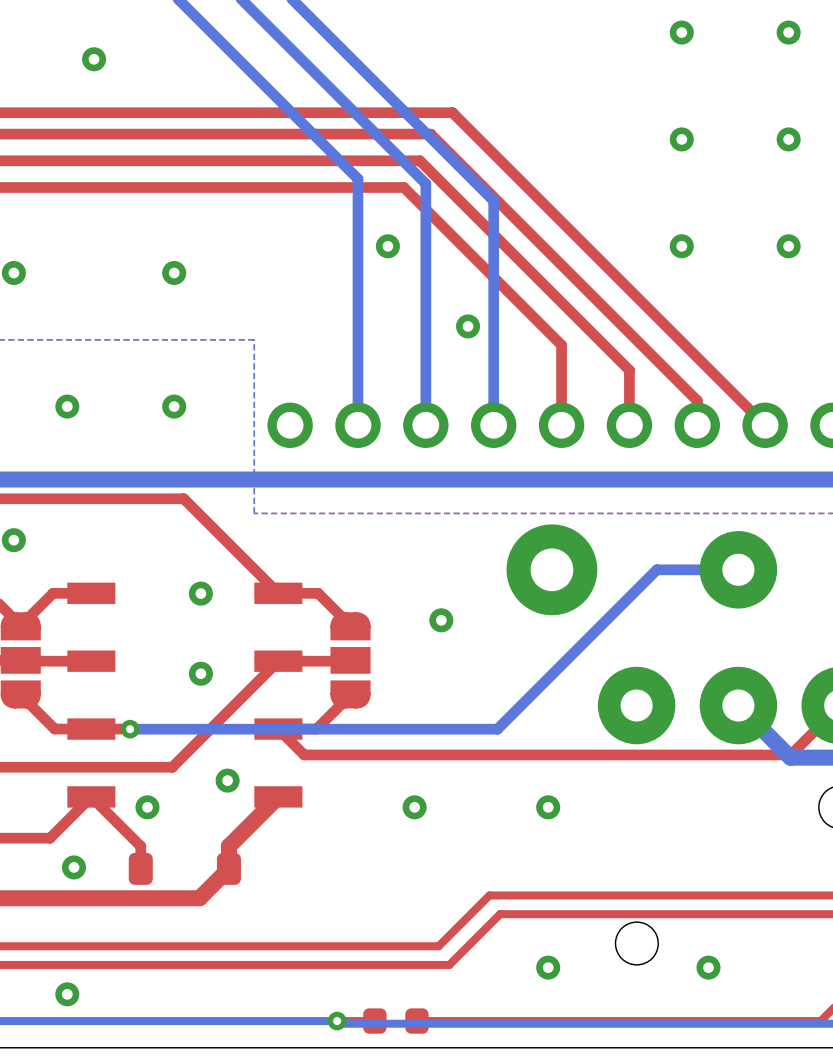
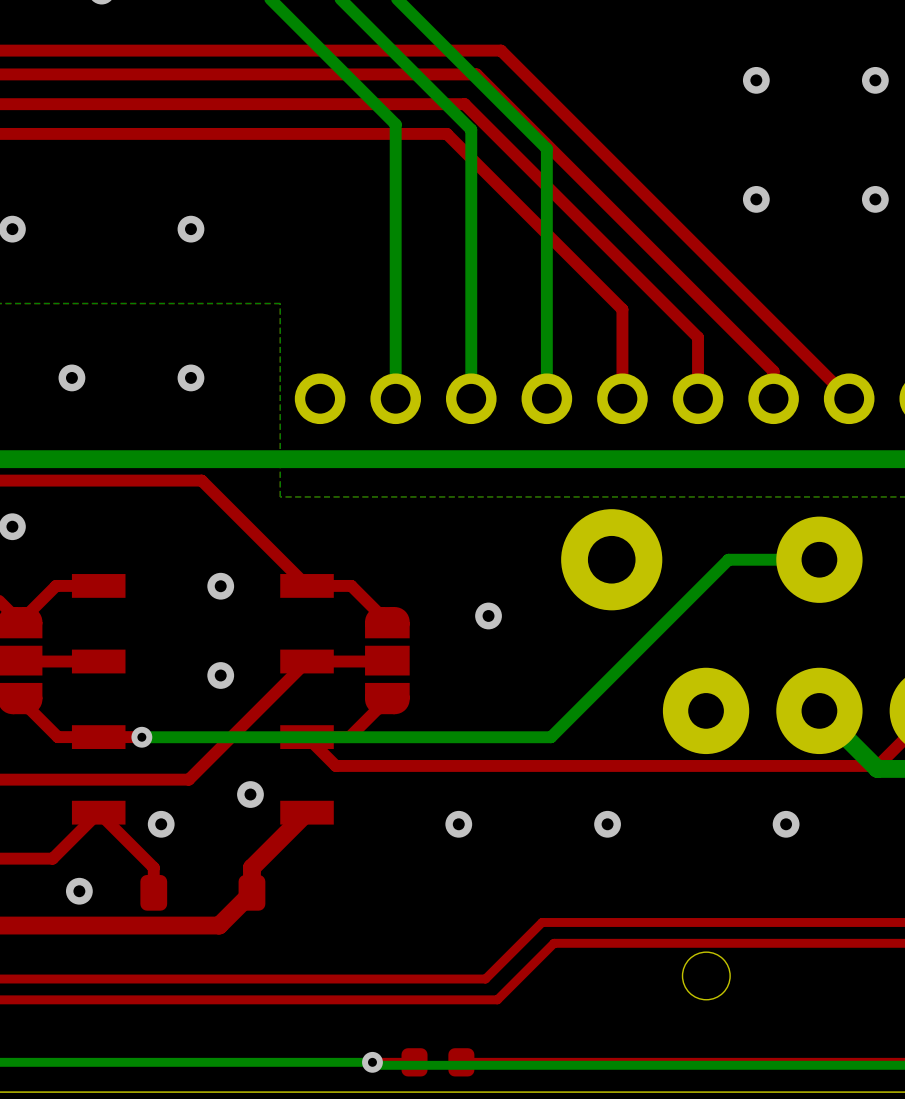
via: (387, 246) -> none
via: (468, 326) -> none
via: none -> (786, 824)
via: (548, 967) -> none
via: (708, 967) -> none
via: (67, 994) -> none

